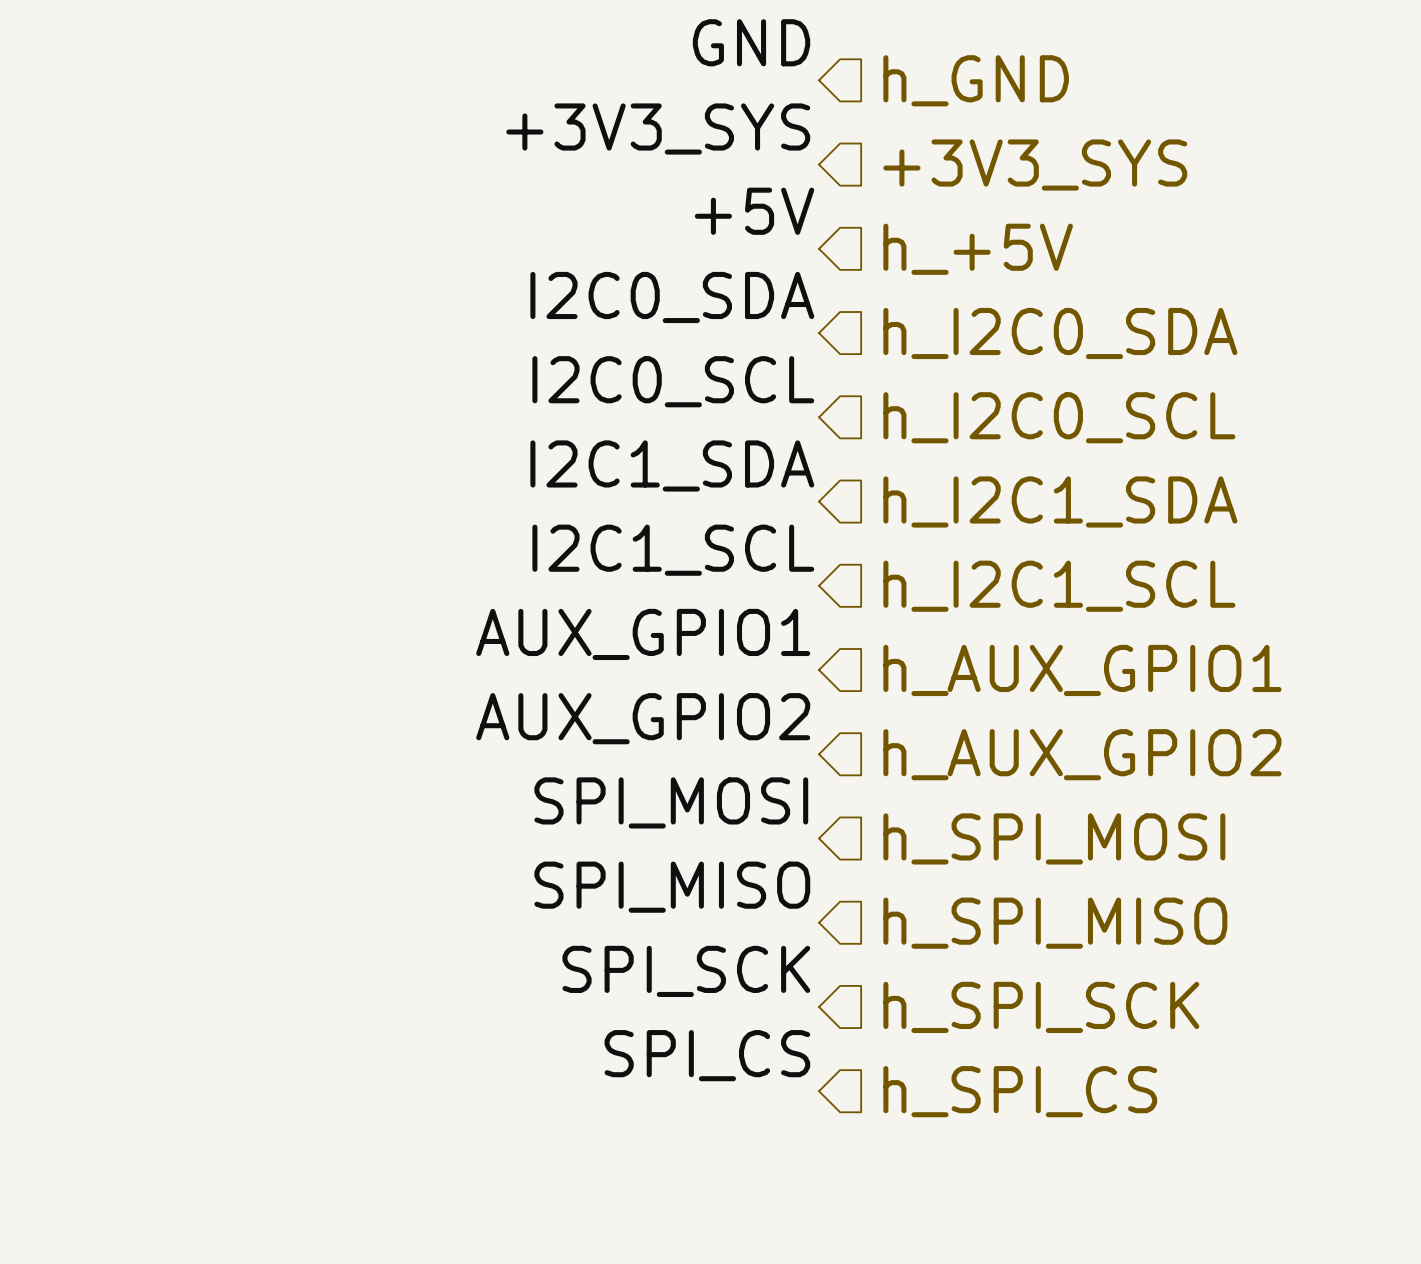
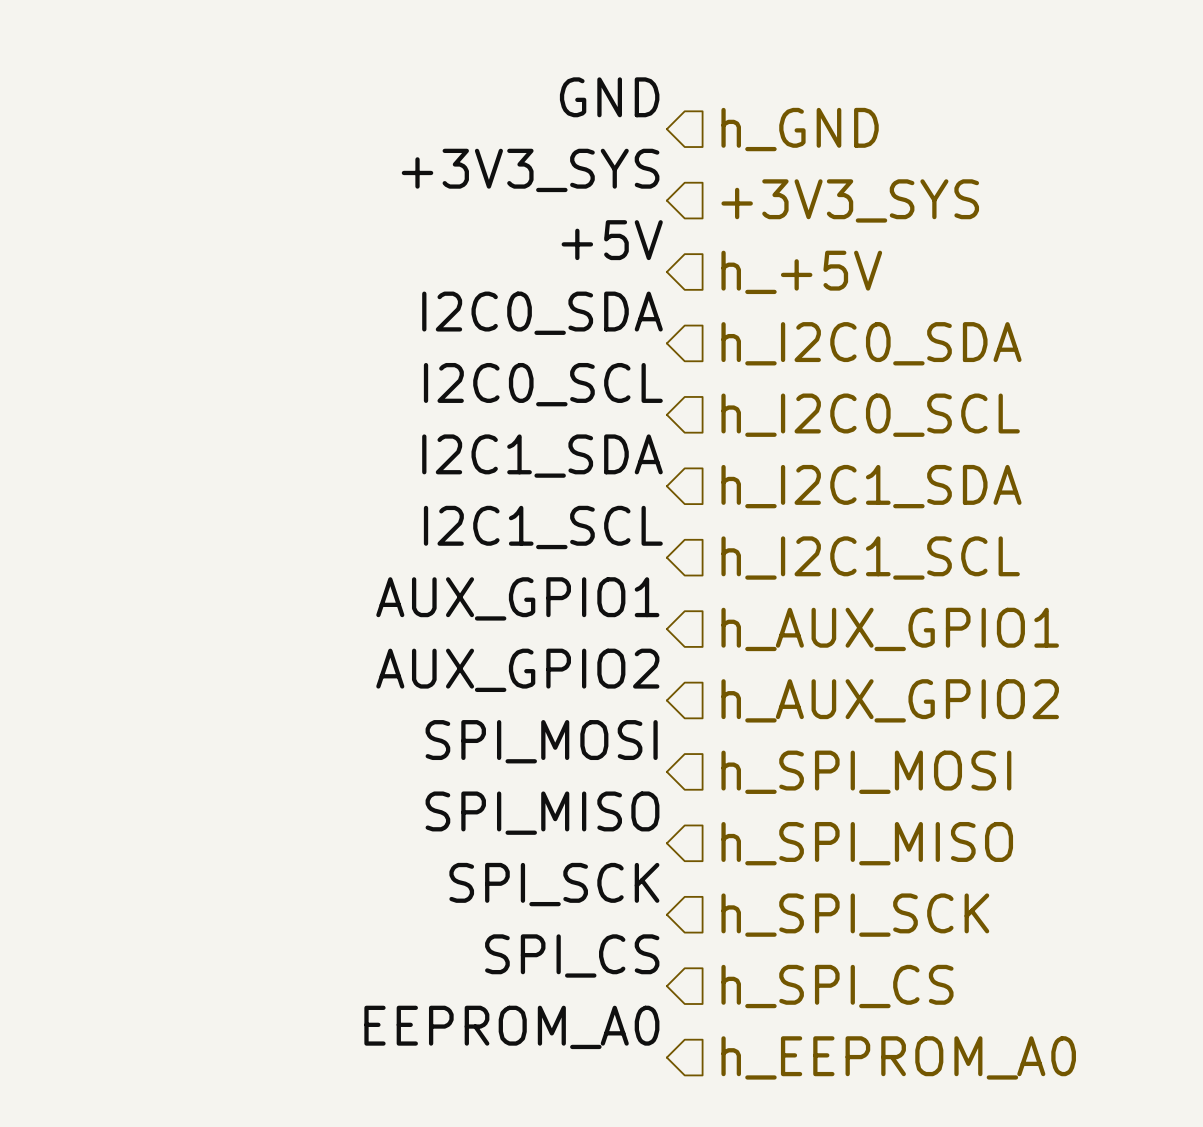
label: none -> EEPROM_A0 (511, 1027)
hierarchical label: none -> h_EEPROM_A0 (898, 1057)

